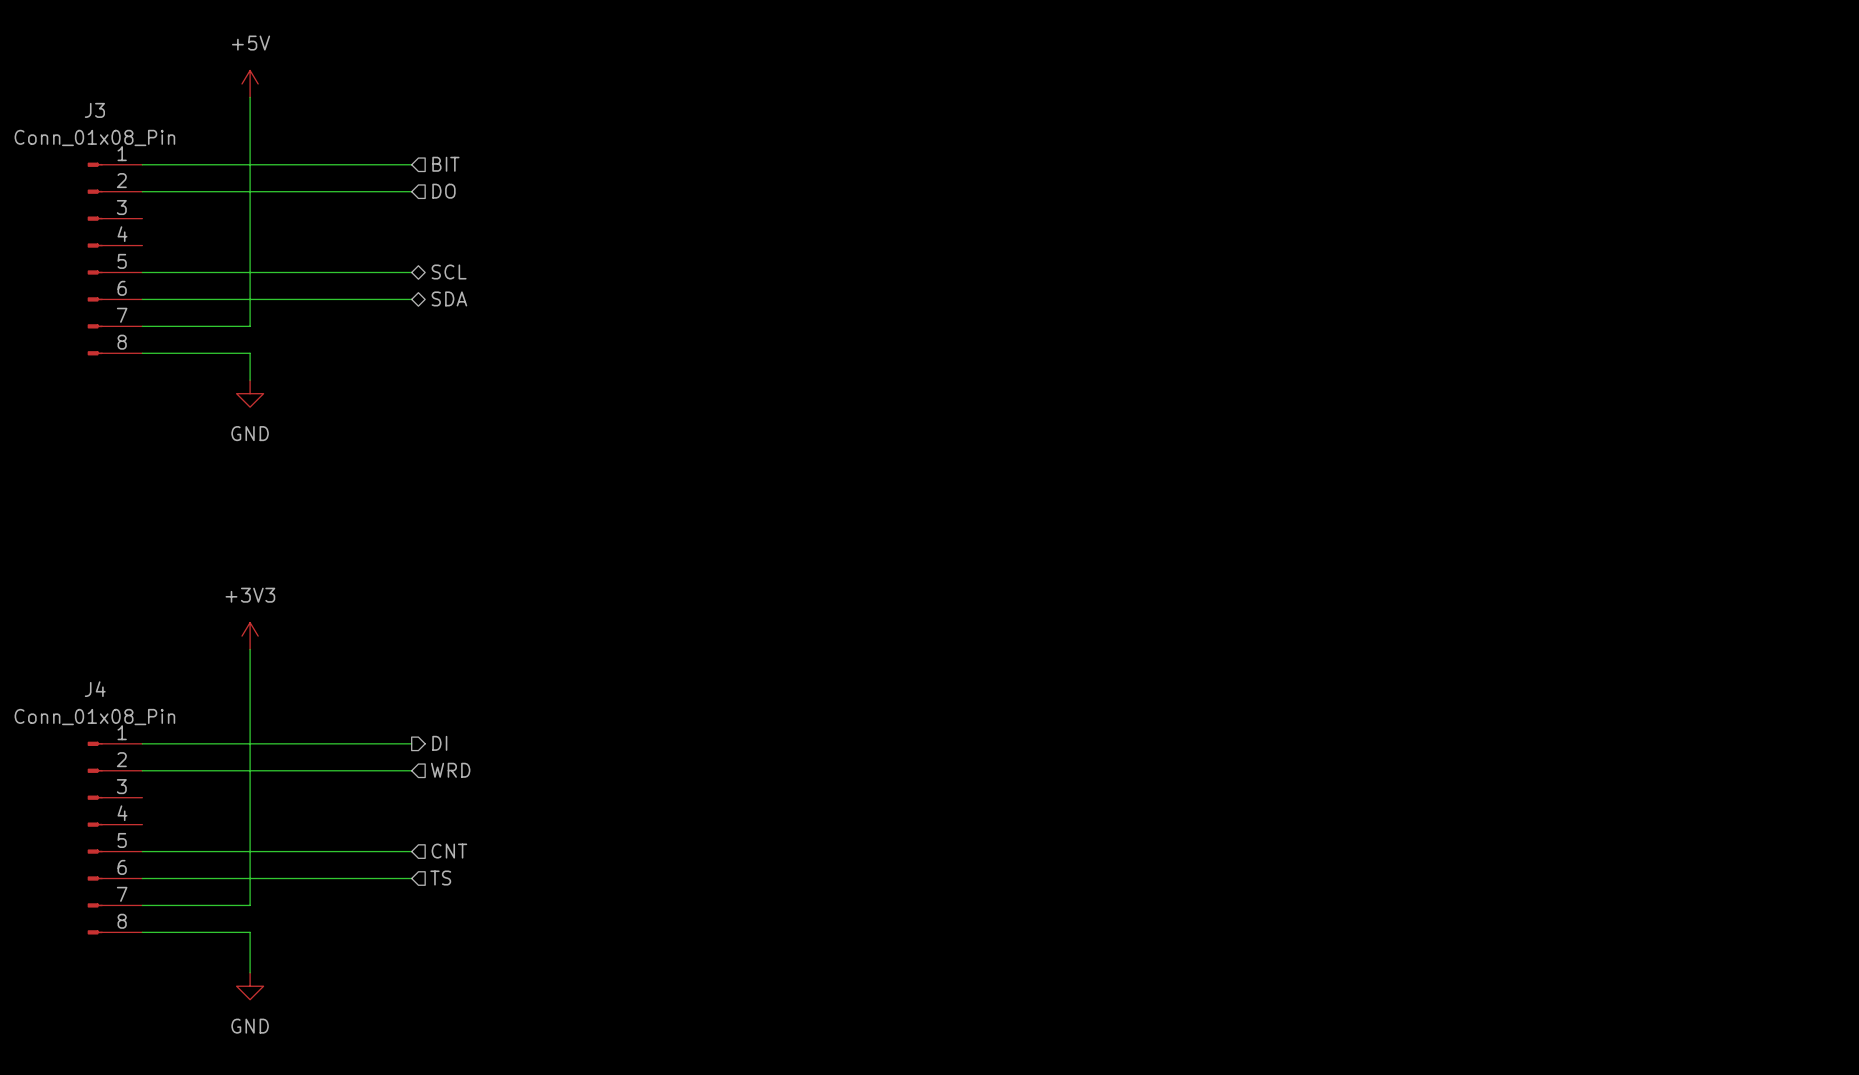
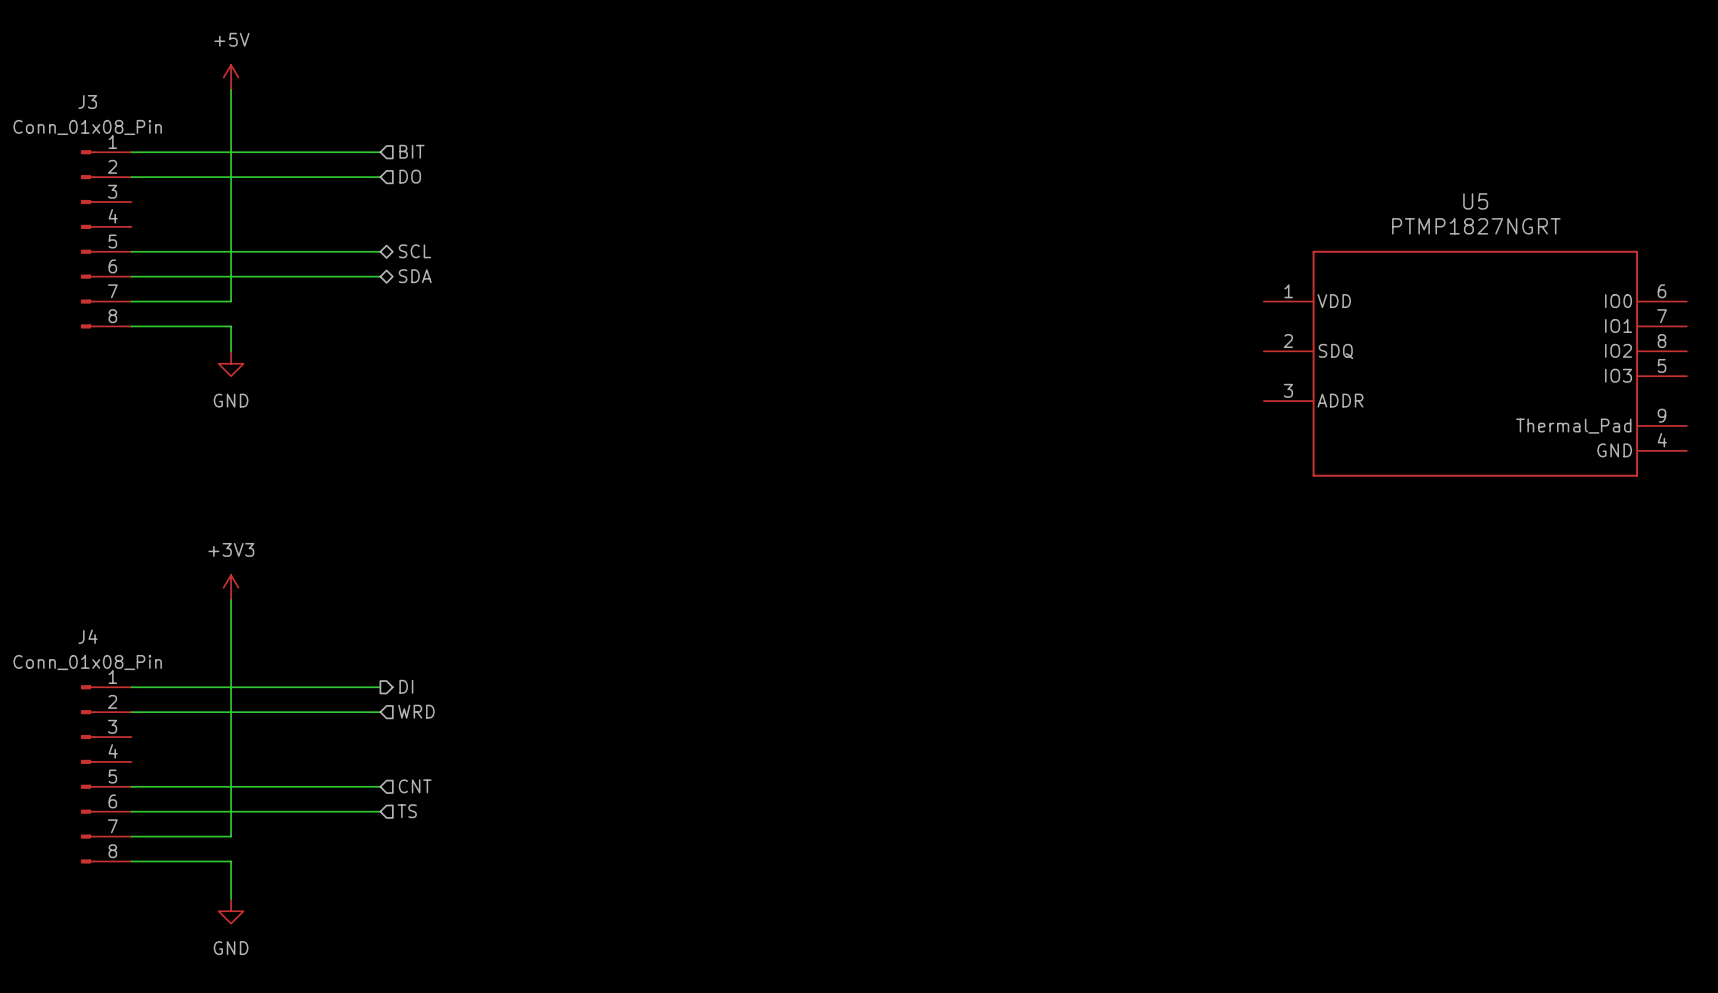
U5: none -> PTMP1827NGRT (1475, 363)

